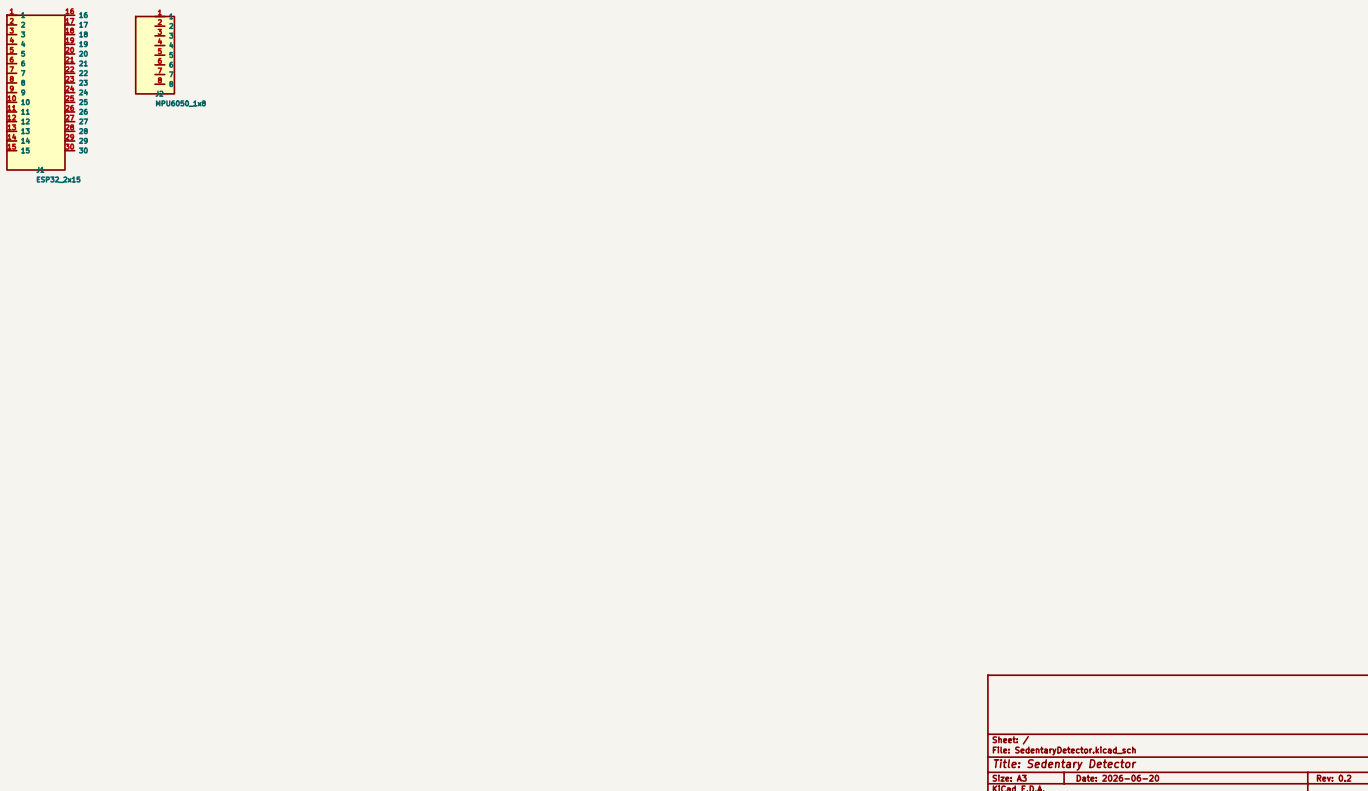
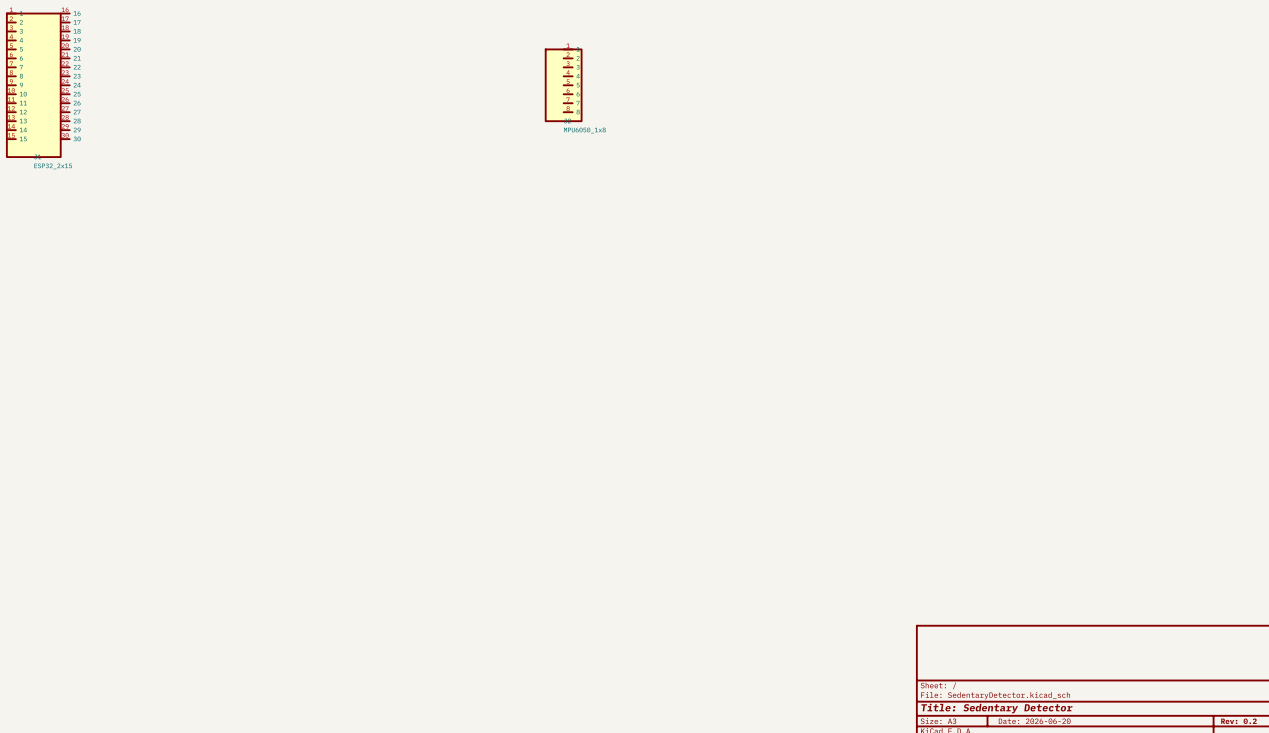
part position: (155, 55) -> (563, 85)

